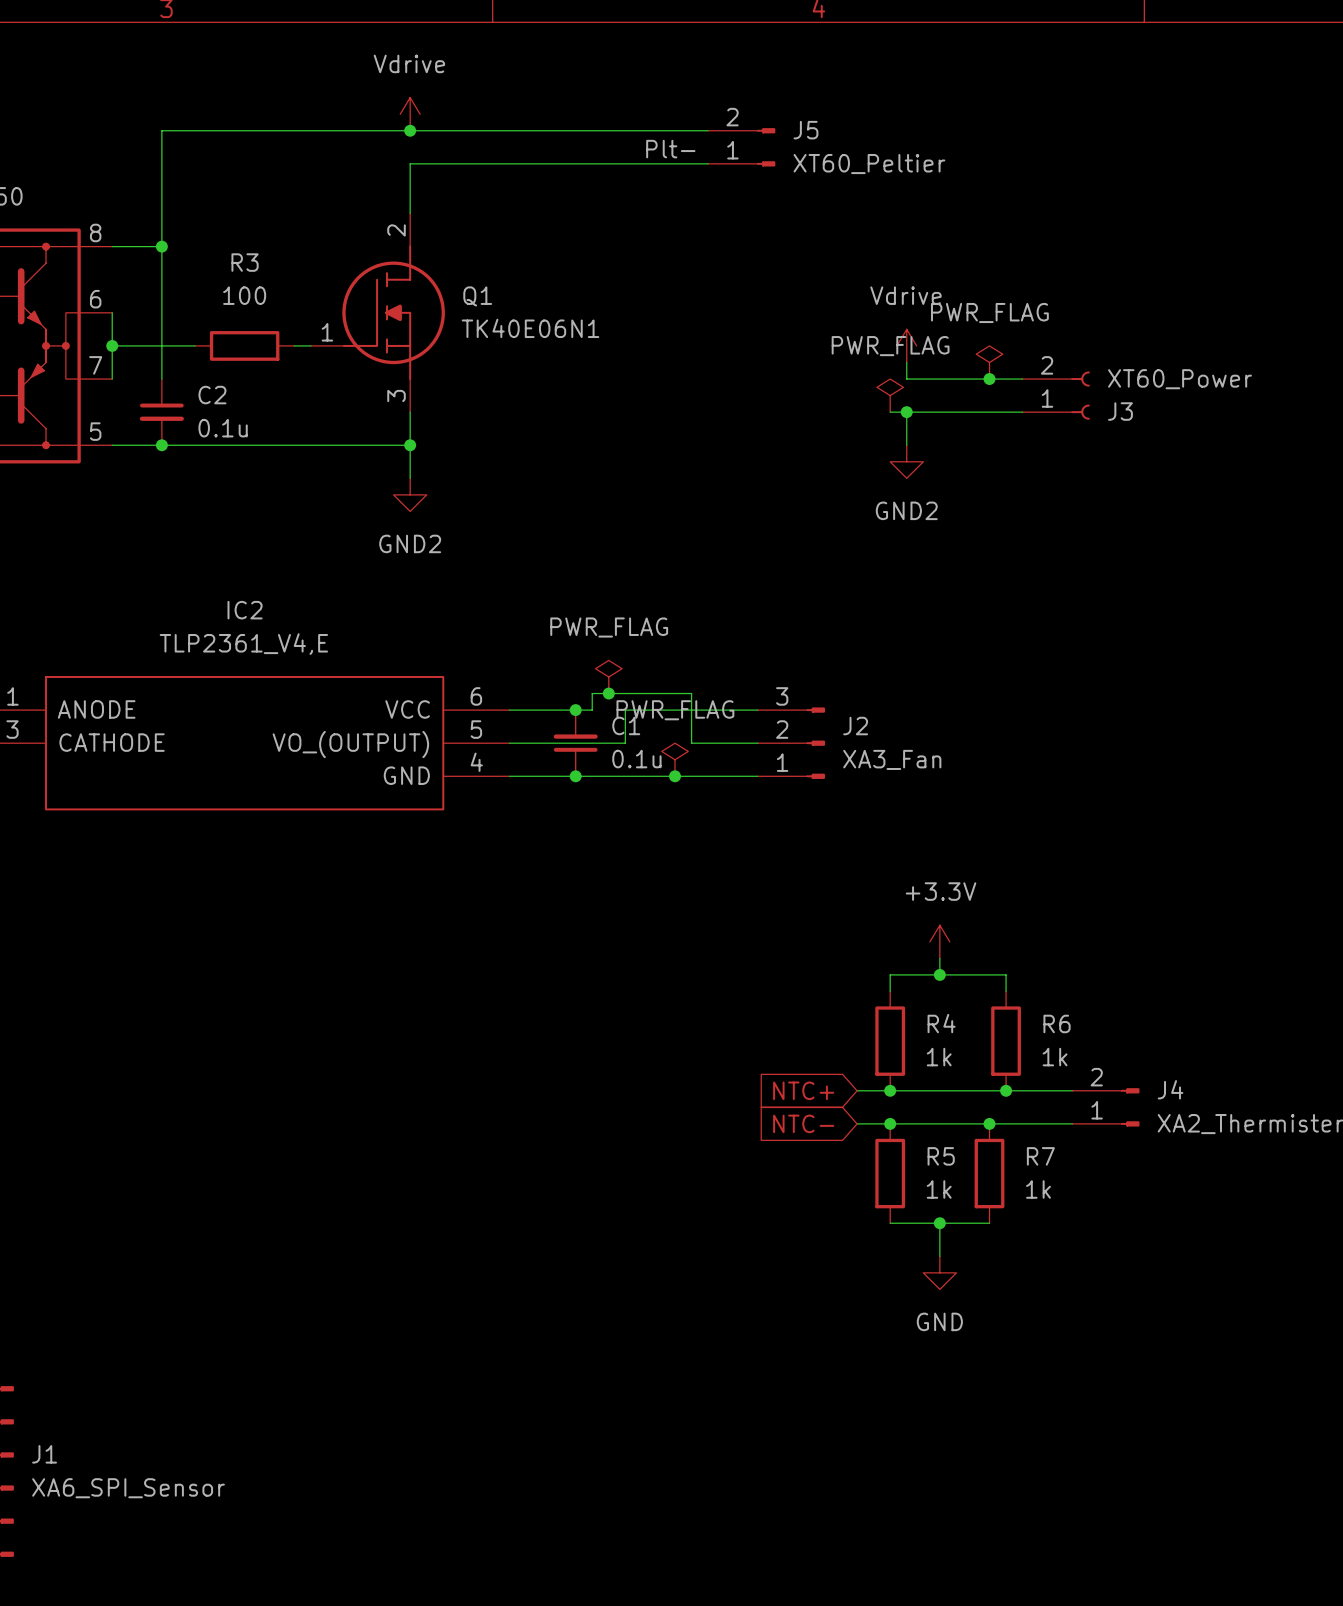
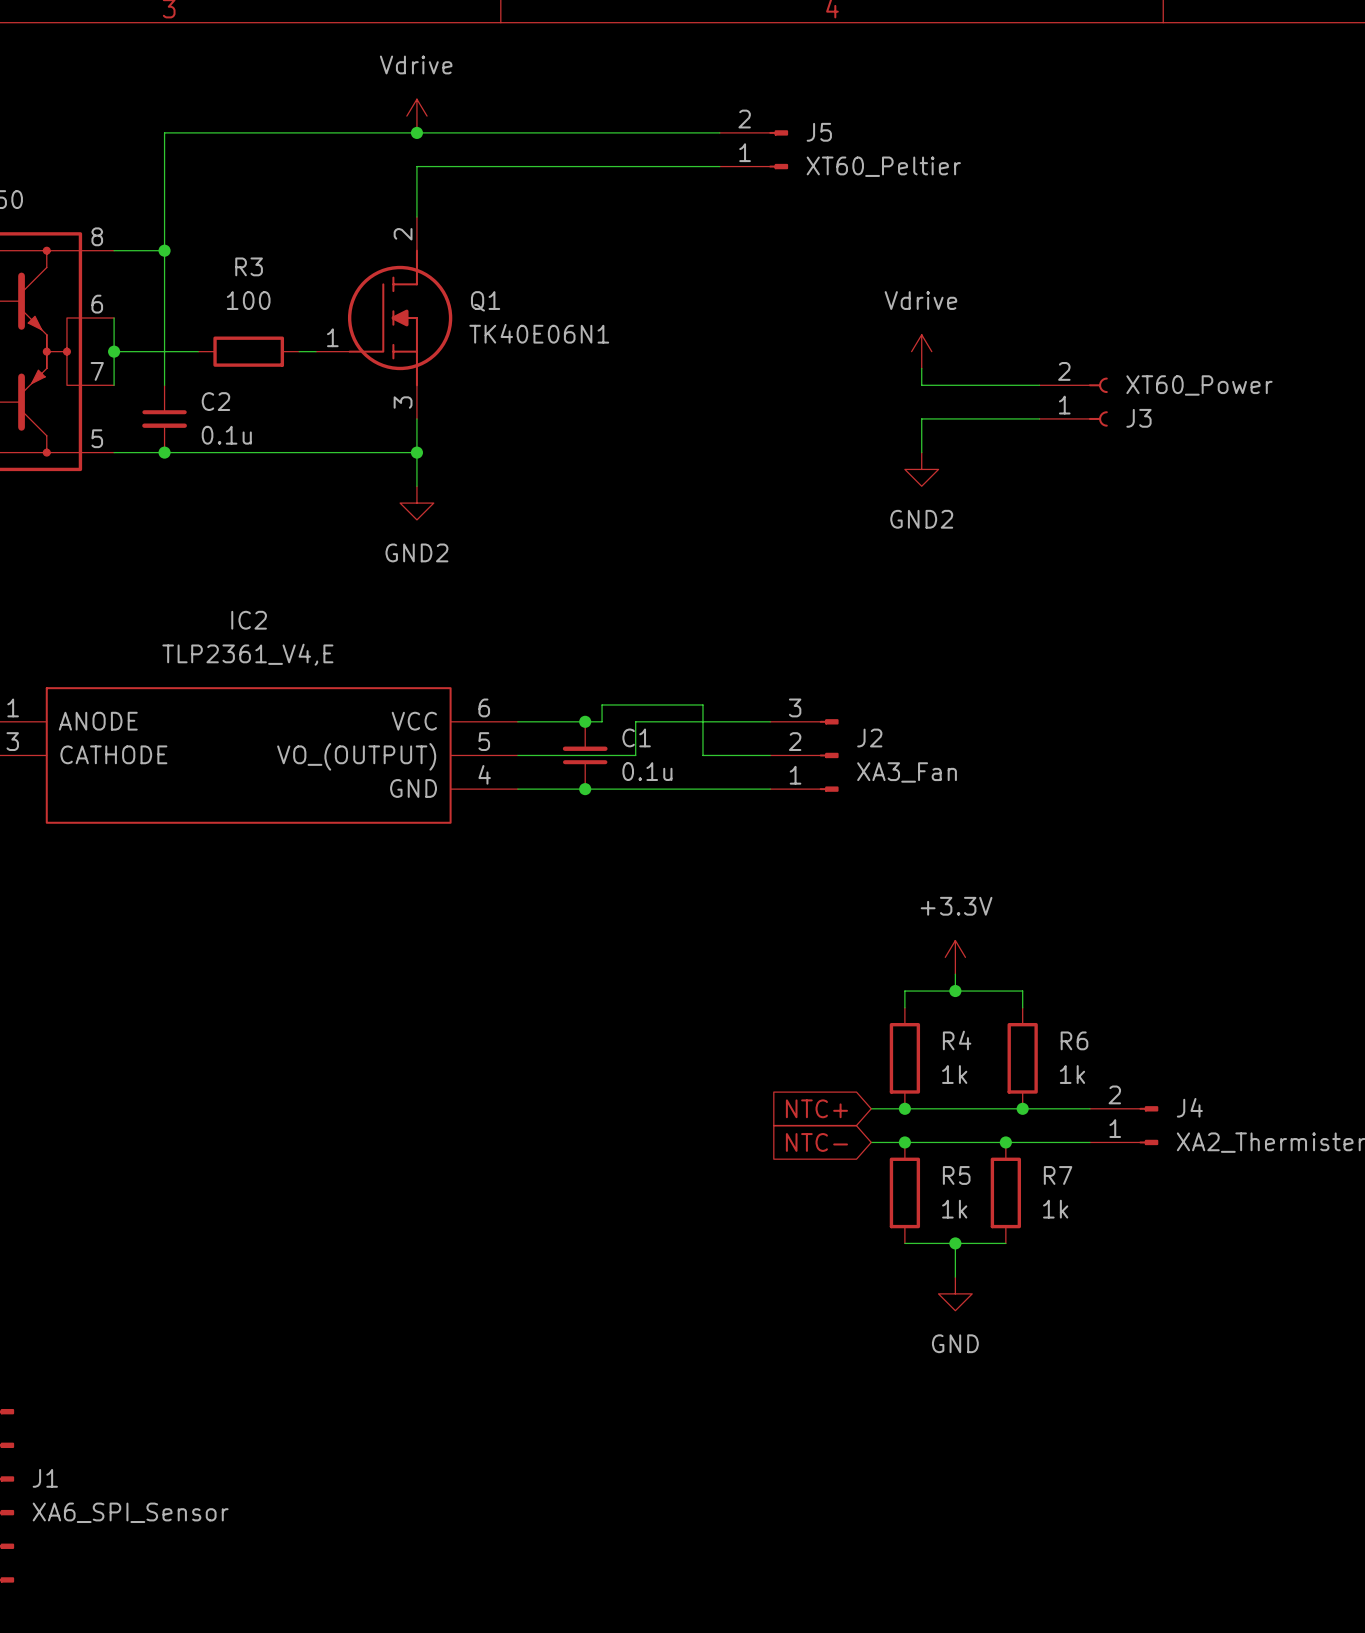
label: Plt- (670, 149) -> none
power symbol: PWR_FLAG (989, 362) -> none
junction: (989, 379) -> none
power symbol: PWR_FLAG (890, 395) -> none
wire: (890, 412) (906, 412) -> none
junction: (906, 412) -> none
power symbol: PWR_FLAG (608, 676) -> none
junction: (608, 693) -> none
power symbol: PWR_FLAG (675, 759) -> none
junction: (675, 776) -> none

